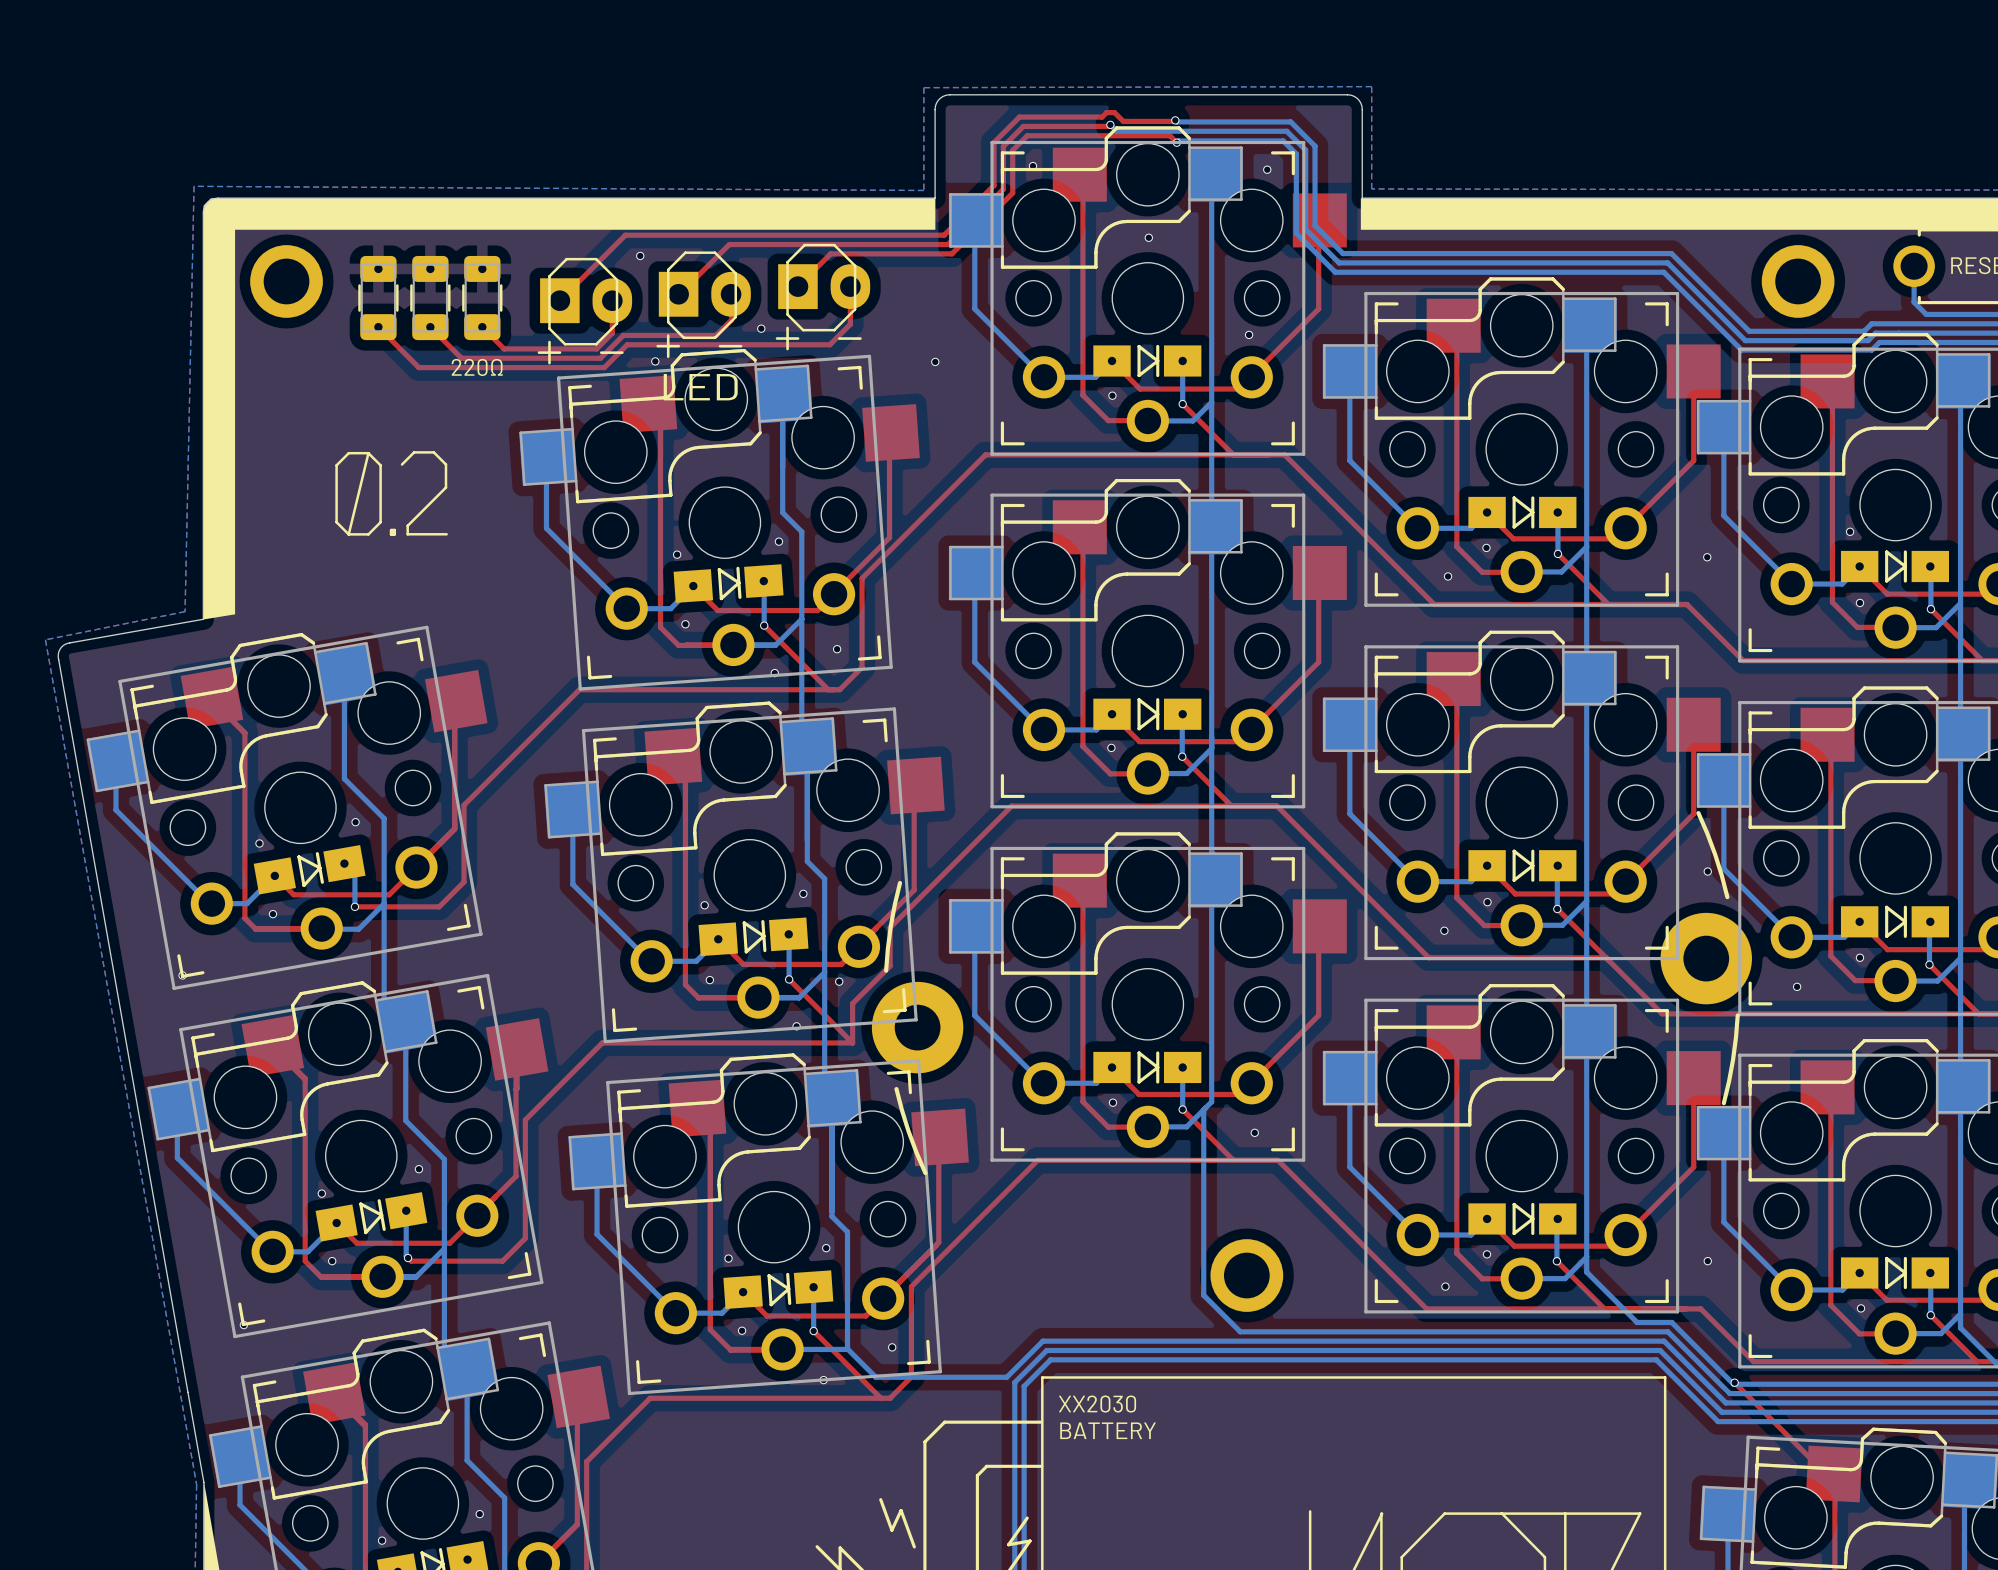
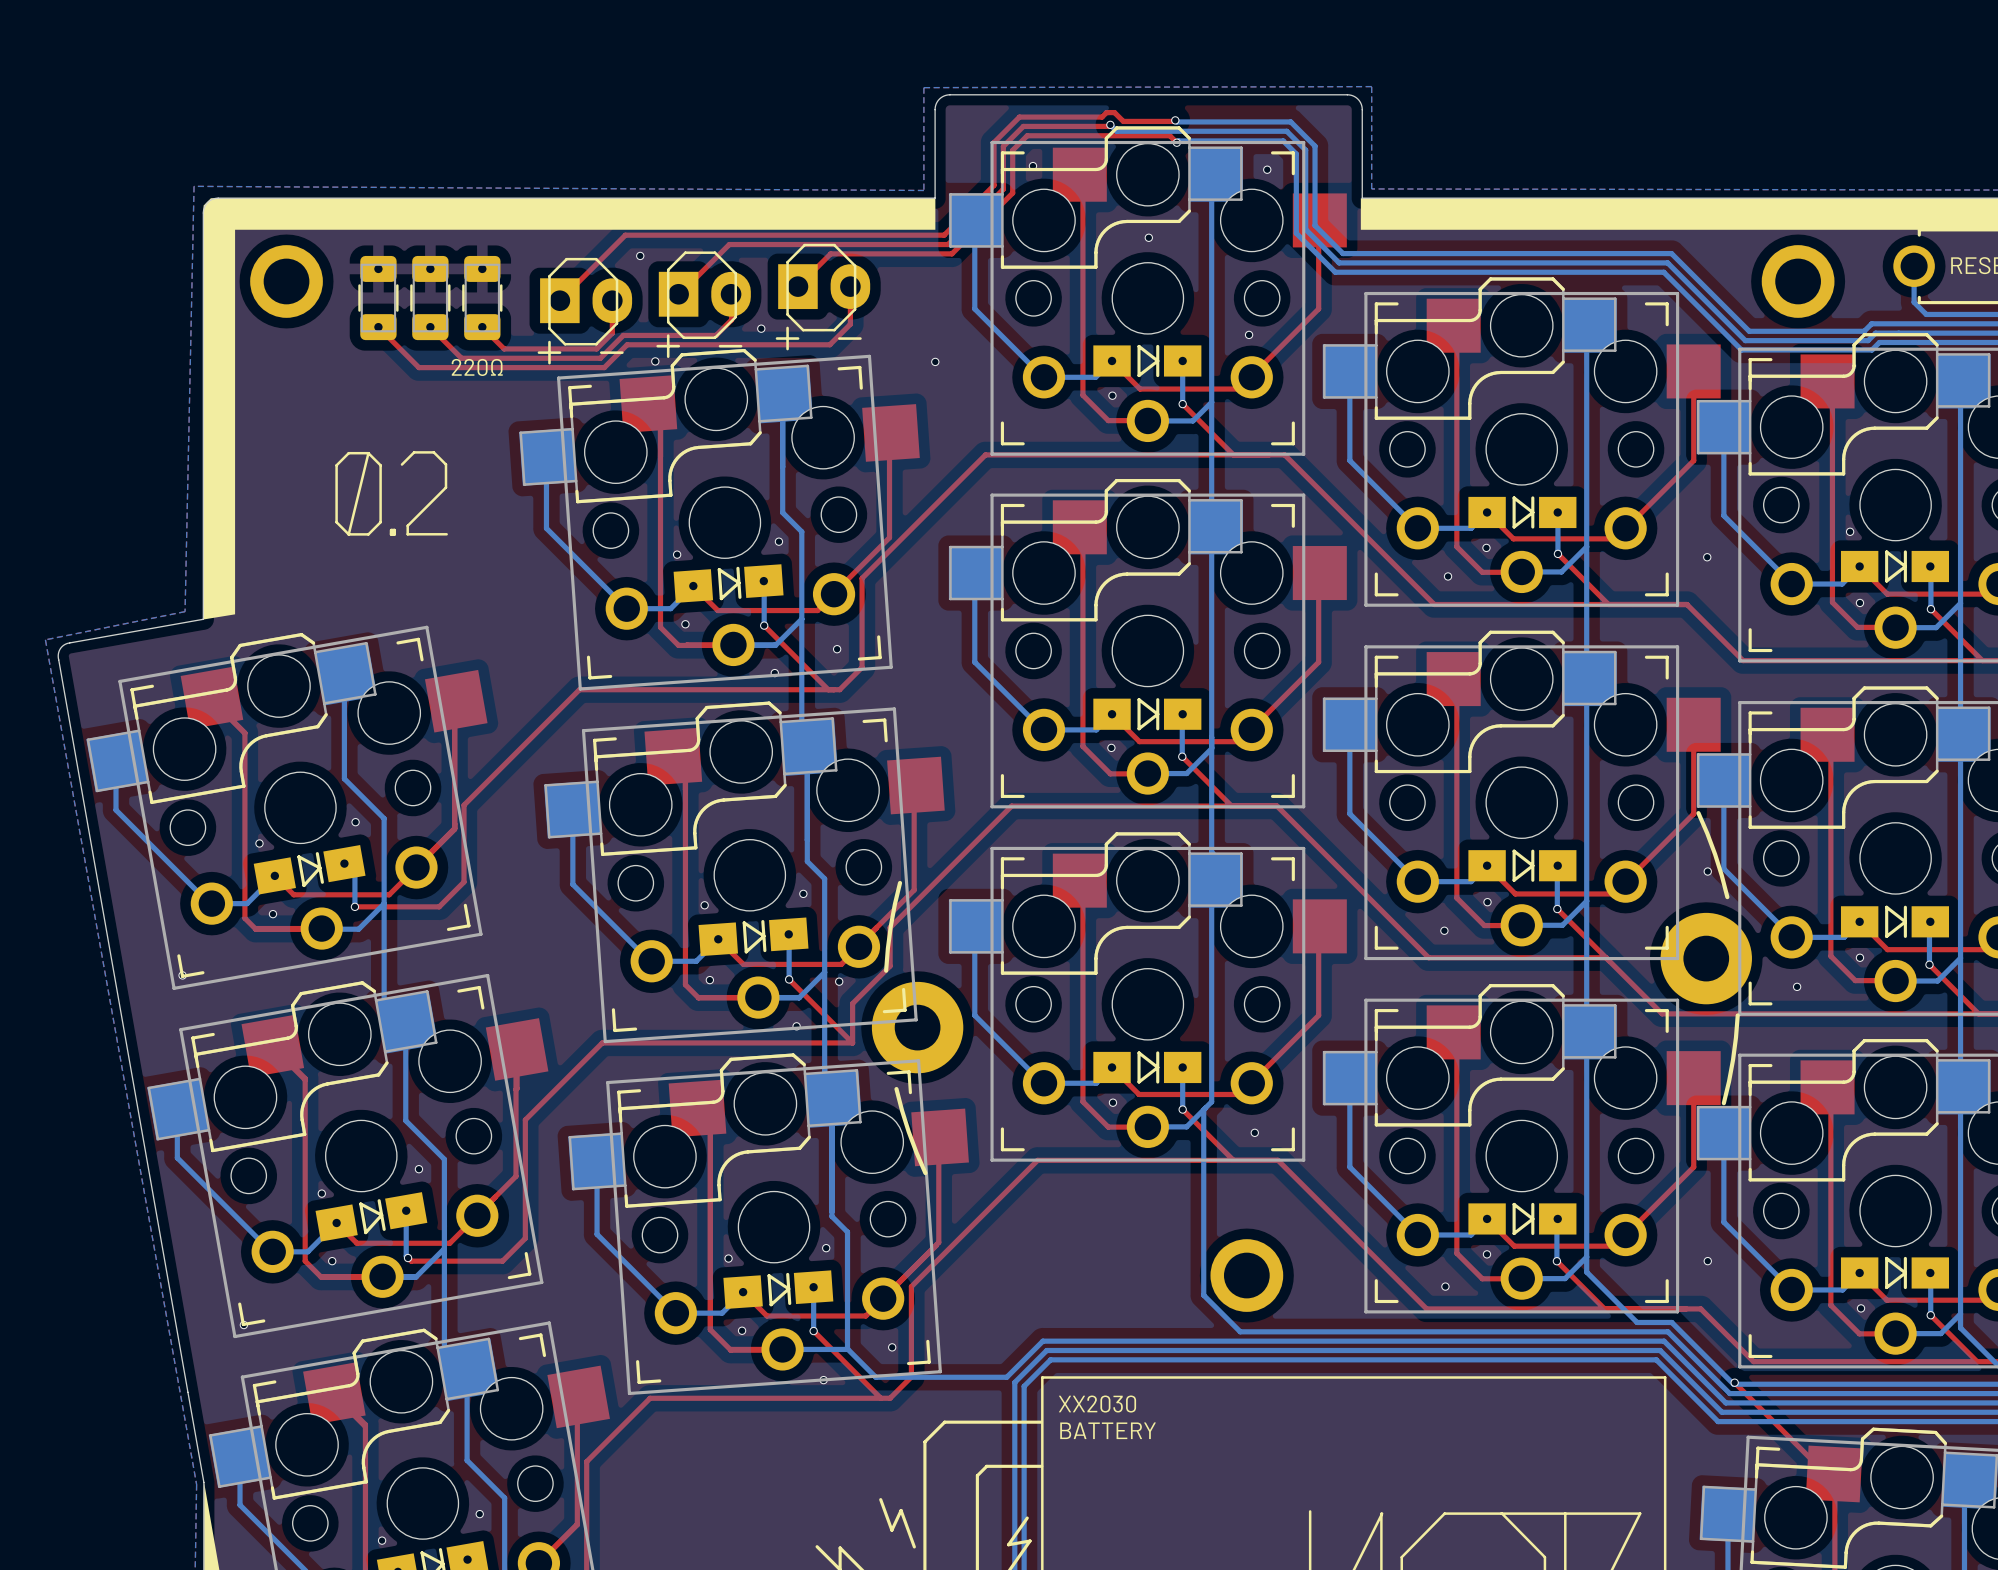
part value: LED (700, 387) -> none

